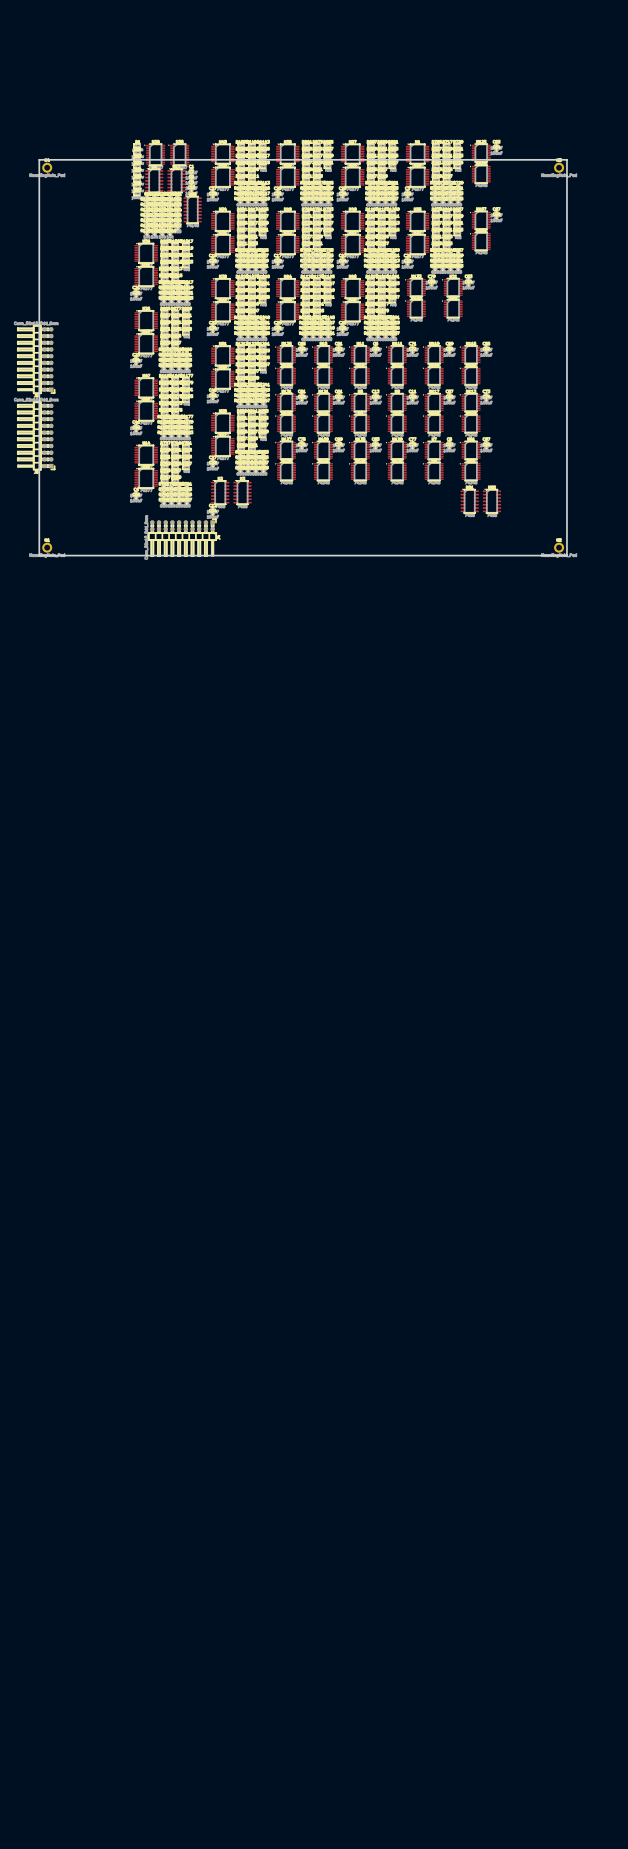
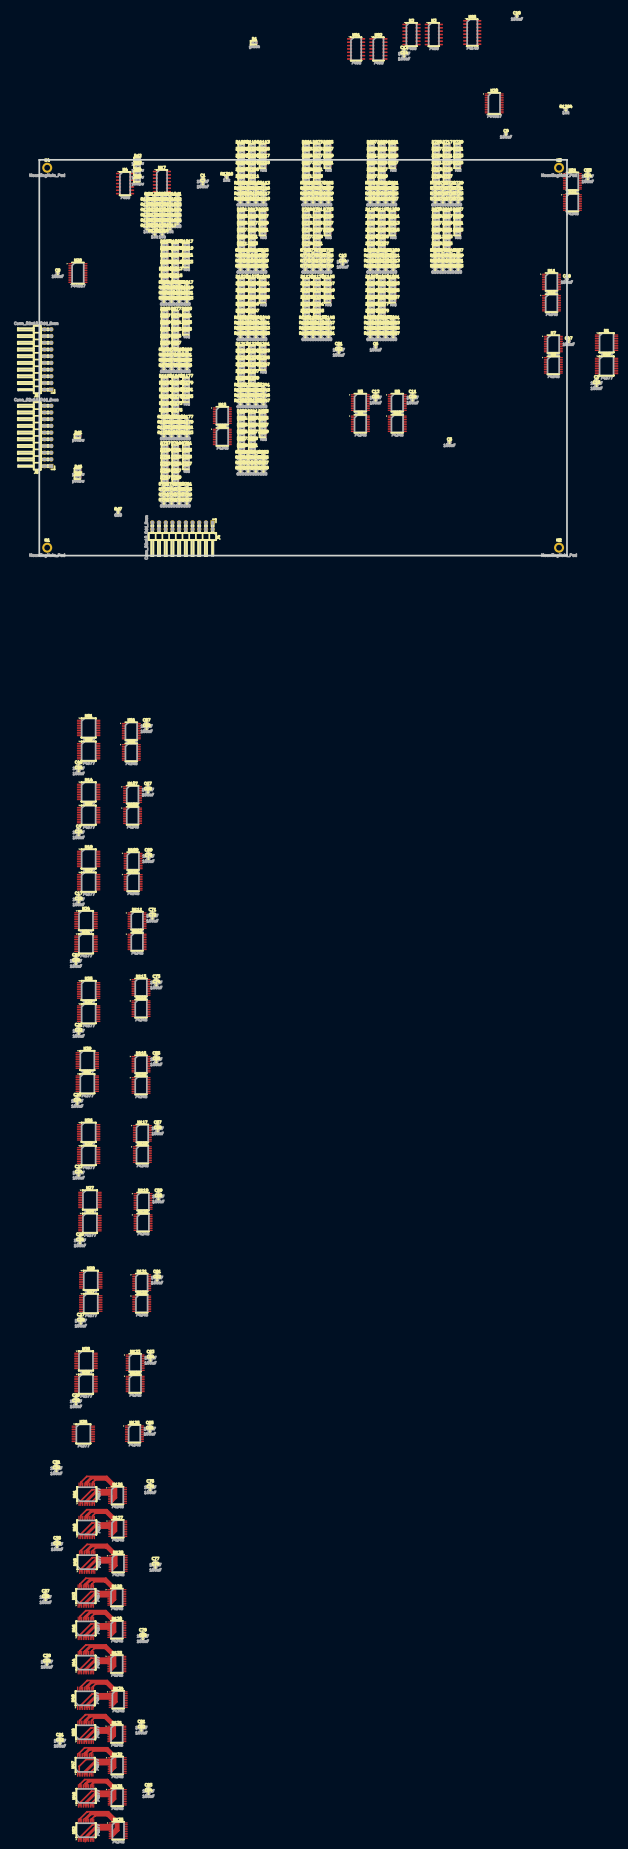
part position: (496, 144) -> (150, 1354)
part position: (137, 145) -> (254, 42)
part position: (496, 150) -> (150, 1359)
part position: (137, 152) -> (77, 436)
part position: (480, 152) -> (134, 1362)
part rotation: 0° (222, 153) -> 90° counterclockwise (85, 1596)
part position: (222, 153) -> (85, 1596)
part position: (287, 153) -> (85, 1360)
part position: (352, 153) -> (89, 1199)
part position: (417, 153) -> (606, 342)
part position: (154, 154) -> (77, 273)
part position: (178, 154) -> (493, 103)
part position: (191, 169) -> (202, 178)
part position: (191, 174) -> (202, 183)
part position: (480, 174) -> (134, 1383)
part rotation: 0° (222, 177) -> 90° counterclockwise (85, 1628)
part position: (222, 177) -> (85, 1628)
part position: (287, 177) -> (85, 1383)
part position: (352, 177) -> (89, 1222)
part position: (417, 177) -> (606, 365)
part position: (154, 180) -> (125, 183)
part position: (176, 180) -> (161, 181)
part position: (191, 180) -> (57, 273)
part position: (191, 185) -> (505, 133)
part position: (137, 186) -> (77, 470)
part position: (191, 190) -> (516, 16)
part position: (212, 191) -> (45, 1594)
part position: (277, 191) -> (75, 1398)
part position: (342, 191) -> (79, 1237)
part position: (407, 191) -> (596, 380)
part position: (137, 193) -> (77, 477)
part position: (212, 196) -> (45, 1599)
part position: (277, 196) -> (75, 1403)
part position: (342, 196) -> (79, 1242)
part position: (407, 196) -> (596, 385)
part position: (192, 209) -> (472, 32)
part position: (496, 212) -> (147, 786)
part position: (496, 217) -> (147, 791)
part position: (480, 220) -> (131, 794)
part position: (222, 221) -> (85, 920)
part position: (287, 221) -> (88, 858)
part rotation: 0° (352, 221) -> 90° counterclockwise (85, 1795)
part position: (352, 221) -> (85, 1795)
part position: (417, 221) -> (88, 990)
part position: (177, 228) -> (118, 512)
part position: (146, 233) -> (565, 109)
part position: (169, 233) -> (226, 176)
part position: (480, 241) -> (131, 815)
part position: (222, 244) -> (85, 943)
part position: (287, 244) -> (88, 881)
part rotation: 0° (352, 244) -> 90° counterclockwise (85, 1830)
part position: (352, 244) -> (85, 1830)
part position: (417, 244) -> (88, 1013)
part position: (146, 253) -> (83, 1433)
part position: (212, 258) -> (75, 957)
part position: (277, 258) -> (78, 896)
part position: (407, 258) -> (78, 1027)
part position: (212, 263) -> (75, 963)
part position: (277, 263) -> (78, 901)
part position: (407, 263) -> (78, 1033)
part rotation: 0° (146, 276) -> 90° counterclockwise (86, 1494)
part position: (146, 276) -> (86, 1494)
part position: (431, 279) -> (142, 1633)
part position: (468, 279) -> (587, 173)
part position: (431, 284) -> (142, 1638)
part position: (468, 284) -> (587, 178)
part position: (415, 287) -> (116, 1663)
part position: (452, 287) -> (571, 181)
part position: (222, 288) -> (87, 1060)
part rotation: 0° (287, 288) -> 90° counterclockwise (85, 1662)
part position: (287, 288) -> (85, 1662)
part rotation: 0° (352, 288) -> 90° counterclockwise (86, 1527)
part position: (352, 288) -> (86, 1527)
part position: (136, 290) -> (56, 1465)
part position: (136, 295) -> (56, 1470)
part position: (415, 308) -> (117, 1699)
part position: (452, 308) -> (571, 202)
part position: (222, 311) -> (87, 1083)
part rotation: 0° (287, 311) -> 90° counterclockwise (84, 1698)
part position: (287, 311) -> (84, 1698)
part rotation: 0° (352, 311) -> 90° counterclockwise (86, 1562)
part position: (352, 311) -> (86, 1562)
part position: (146, 320) -> (88, 1132)
part position: (212, 325) -> (77, 1097)
part position: (277, 325) -> (46, 1658)
part position: (342, 325) -> (57, 1541)
part position: (212, 331) -> (77, 1103)
part position: (277, 331) -> (46, 1663)
part position: (342, 331) -> (57, 1546)
part position: (146, 343) -> (88, 1155)
part position: (301, 346) -> (149, 1425)
part position: (412, 346) -> (152, 912)
part position: (449, 346) -> (158, 1193)
part position: (486, 346) -> (156, 1056)
part position: (301, 351) -> (149, 1430)
part position: (375, 351) -> (566, 279)
part position: (412, 351) -> (152, 917)
part position: (449, 351) -> (158, 1198)
part position: (486, 351) -> (156, 1061)
part position: (285, 354) -> (133, 1433)
part position: (322, 354) -> (221, 415)
part position: (359, 354) -> (550, 281)
part position: (396, 354) -> (136, 920)
part position: (433, 354) -> (142, 1201)
part position: (470, 354) -> (140, 1064)
part position: (222, 355) -> (88, 727)
part position: (136, 357) -> (78, 1169)
part position: (136, 363) -> (78, 1174)
part position: (285, 376) -> (116, 1495)
part position: (322, 376) -> (221, 436)
part position: (359, 376) -> (550, 303)
part position: (396, 376) -> (136, 941)
part position: (433, 376) -> (142, 1222)
part position: (470, 376) -> (140, 1085)
part position: (222, 378) -> (88, 750)
part rotation: 0° (146, 387) -> 90° counterclockwise (84, 1764)
part position: (146, 387) -> (84, 1764)
part position: (212, 393) -> (78, 765)
part position: (301, 394) -> (141, 1724)
part position: (338, 394) -> (157, 1274)
part position: (449, 394) -> (157, 1125)
part position: (486, 394) -> (156, 979)
part position: (212, 398) -> (78, 770)
part position: (301, 399) -> (141, 1729)
part position: (338, 399) -> (157, 1279)
part position: (449, 399) -> (157, 1130)
part position: (486, 399) -> (156, 984)
part position: (285, 402) -> (116, 1733)
part position: (322, 402) -> (140, 1282)
part position: (433, 402) -> (141, 1133)
part position: (470, 402) -> (140, 987)
part rotation: 0° (146, 410) -> 90° counterclockwise (85, 1732)
part position: (146, 410) -> (85, 1732)
part position: (222, 422) -> (90, 1280)
part position: (285, 423) -> (116, 1765)
part position: (322, 423) -> (140, 1303)
part position: (433, 423) -> (141, 1154)
part position: (470, 423) -> (140, 1008)
part position: (136, 425) -> (59, 1737)
part position: (136, 430) -> (59, 1742)
part position: (301, 442) -> (150, 1484)
part position: (338, 442) -> (148, 853)
part position: (375, 442) -> (148, 1788)
part position: (412, 442) -> (155, 1561)
part position: (486, 442) -> (146, 723)
part position: (222, 446) -> (90, 1303)
part position: (301, 447) -> (150, 1489)
part position: (338, 447) -> (148, 858)
part position: (375, 447) -> (148, 1793)
part position: (412, 447) -> (155, 1566)
part position: (449, 447) -> (568, 341)
part position: (486, 447) -> (146, 728)
part position: (285, 450) -> (116, 1528)
part position: (322, 450) -> (132, 861)
part position: (359, 450) -> (117, 1830)
part position: (396, 450) -> (116, 1597)
part position: (433, 450) -> (552, 344)
part position: (470, 450) -> (130, 731)
part position: (146, 454) -> (88, 791)
part position: (212, 460) -> (80, 1317)
part position: (212, 465) -> (80, 1322)
part position: (285, 471) -> (117, 1563)
part position: (322, 471) -> (132, 882)
part position: (359, 471) -> (116, 1797)
part position: (396, 471) -> (116, 1629)
part position: (433, 471) -> (552, 365)
part position: (470, 471) -> (130, 752)
part position: (146, 478) -> (88, 814)
part position: (136, 492) -> (78, 829)
part position: (220, 492) -> (411, 34)
part position: (242, 492) -> (433, 34)
part position: (136, 497) -> (78, 834)
part position: (469, 500) -> (356, 48)
part position: (491, 500) -> (378, 48)
part position: (212, 508) -> (404, 50)
part position: (212, 513) -> (404, 55)
top track: none -> (80, 1484) (86, 1476) (106, 1476) (116, 1485) (116, 1497) (110, 1501)
top track: none -> (85, 1484) (90, 1477) (106, 1477) (115, 1486) (115, 1497) (110, 1499)
top track: none -> (87, 1484) (91, 1478) (106, 1478) (114, 1486) (114, 1496) (110, 1498)
top track: none -> (92, 1484) (95, 1479) (105, 1479) (113, 1487) (113, 1495) (110, 1496)
top track: none -> (110, 1489) (91, 1489) (80, 1500) (80, 1503)
top track: none -> (110, 1491) (95, 1491) (85, 1500) (85, 1503)
top track: none -> (110, 1493) (95, 1493) (87, 1500) (87, 1503)
top track: none -> (110, 1494) (98, 1494) (92, 1503)
top track: none -> (80, 1518) (86, 1509) (106, 1509) (116, 1519) (116, 1531) (110, 1534)
top track: none -> (85, 1518) (90, 1510) (106, 1510) (115, 1519) (115, 1530) (110, 1533)
top track: none -> (87, 1518) (91, 1511) (106, 1511) (114, 1520) (114, 1529) (110, 1531)
top track: none -> (92, 1518) (95, 1513) (105, 1513) (113, 1520) (113, 1529) (110, 1529)
top track: none -> (110, 1522) (91, 1522) (80, 1534) (80, 1536)
top track: none -> (110, 1524) (95, 1524) (85, 1534) (85, 1536)
top track: none -> (110, 1526) (95, 1526) (87, 1534) (87, 1536)
top track: none -> (110, 1528) (98, 1528) (92, 1536)
top track: none -> (81, 1552) (87, 1544) (107, 1544) (116, 1553) (116, 1565) (110, 1569)
top track: none -> (86, 1552) (91, 1545) (106, 1545) (115, 1554) (115, 1565) (110, 1567)
top track: none -> (88, 1552) (91, 1546) (106, 1546) (114, 1554) (114, 1564) (110, 1566)
top track: none -> (93, 1552) (95, 1547) (106, 1547) (113, 1555) (113, 1563) (110, 1564)
top track: none -> (110, 1557) (92, 1557) (81, 1568) (81, 1571)
top track: none -> (110, 1559) (95, 1559) (86, 1568) (86, 1571)
top track: none -> (110, 1561) (95, 1561) (88, 1568) (88, 1571)
top track: none -> (110, 1562) (99, 1562) (93, 1571)
top track: none -> (79, 1586) (85, 1578) (105, 1578) (115, 1587) (115, 1599) (109, 1603)
top track: none -> (85, 1586) (89, 1579) (105, 1579) (114, 1588) (114, 1598) (109, 1601)
top track: none -> (86, 1586) (90, 1580) (105, 1580) (113, 1588) (113, 1598) (109, 1600)
top track: none -> (91, 1586) (94, 1581) (104, 1581) (112, 1589) (112, 1597) (109, 1598)
top track: none -> (109, 1591) (91, 1591) (79, 1602) (79, 1605)
top track: none -> (109, 1593) (94, 1593) (85, 1602) (85, 1605)
top track: none -> (109, 1594) (94, 1594) (86, 1602) (86, 1605)
top track: none -> (109, 1596) (97, 1596) (91, 1605)
top track: none -> (79, 1619) (85, 1610) (105, 1610) (115, 1620) (115, 1631) (109, 1635)
top track: none -> (85, 1619) (89, 1611) (105, 1611) (114, 1620) (114, 1631) (109, 1634)
top track: none -> (86, 1619) (90, 1612) (105, 1612) (113, 1621) (113, 1630) (109, 1632)
top track: none -> (91, 1619) (94, 1614) (104, 1614) (112, 1621) (112, 1629) (109, 1630)
top track: none -> (109, 1623) (91, 1623) (79, 1634) (79, 1637)
top track: none -> (109, 1625) (94, 1625) (85, 1634) (85, 1637)
top track: none -> (109, 1627) (94, 1627) (86, 1634) (86, 1637)
top track: none -> (109, 1629) (97, 1629) (91, 1637)
top track: none -> (79, 1653) (85, 1644) (105, 1644) (115, 1654) (115, 1666) (109, 1670)
top track: none -> (85, 1653) (89, 1645) (105, 1645) (114, 1654) (114, 1665) (109, 1668)
top track: none -> (86, 1653) (90, 1647) (105, 1647) (113, 1655) (113, 1664) (109, 1666)
top track: none -> (91, 1653) (94, 1648) (104, 1648) (112, 1655) (112, 1664) (109, 1665)
top track: none -> (109, 1658) (91, 1658) (79, 1669) (79, 1671)
top track: none -> (109, 1659) (94, 1659) (85, 1669) (85, 1671)
top track: none -> (109, 1661) (94, 1661) (86, 1669) (86, 1671)
top track: none -> (109, 1663) (97, 1663) (91, 1671)
top track: none -> (81, 1688) (87, 1680) (107, 1680) (116, 1690) (116, 1701) (110, 1705)
top track: none -> (86, 1688) (91, 1681) (106, 1681) (115, 1690) (115, 1701) (110, 1704)
top track: none -> (88, 1688) (91, 1682) (106, 1682) (114, 1690) (114, 1700) (110, 1702)
top track: none -> (93, 1688) (95, 1683) (106, 1683) (113, 1691) (113, 1699) (110, 1700)
top track: none -> (110, 1693) (92, 1693) (81, 1704) (81, 1707)
top track: none -> (110, 1695) (95, 1695) (86, 1704) (86, 1707)
top track: none -> (110, 1697) (95, 1697) (88, 1704) (88, 1707)
top track: none -> (110, 1698) (99, 1698) (93, 1707)
top track: none -> (79, 1723) (85, 1714) (105, 1714) (115, 1724) (115, 1735) (109, 1739)
top track: none -> (84, 1723) (89, 1715) (105, 1715) (114, 1724) (114, 1735) (109, 1738)
top track: none -> (86, 1723) (90, 1716) (104, 1716) (113, 1725) (113, 1734) (109, 1736)
top track: none -> (91, 1723) (94, 1718) (104, 1718) (112, 1725) (112, 1733) (109, 1734)
top track: none -> (109, 1727) (90, 1727) (79, 1739) (79, 1741)
top track: none -> (109, 1729) (94, 1729) (84, 1739) (84, 1741)
top track: none -> (109, 1731) (94, 1731) (86, 1739) (86, 1741)
top track: none -> (109, 1733) (97, 1733) (91, 1741)
top track: none -> (79, 1755) (84, 1747) (107, 1747) (115, 1755) (115, 1767) (109, 1771)
top track: none -> (84, 1755) (88, 1748) (107, 1748) (114, 1756) (114, 1766) (109, 1769)
top track: none -> (86, 1755) (89, 1749) (106, 1749) (113, 1756) (113, 1766) (109, 1768)
top track: none -> (91, 1755) (93, 1750) (106, 1750) (112, 1757) (112, 1765) (109, 1766)
top track: none -> (109, 1759) (86, 1759) (79, 1766) (79, 1774)
top track: none -> (109, 1761) (94, 1761) (84, 1771) (84, 1774)
top track: none -> (109, 1762) (94, 1762) (86, 1771) (86, 1774)
top track: none -> (109, 1764) (98, 1764) (91, 1774)
top track: none -> (80, 1786) (84, 1779) (107, 1779) (115, 1787) (115, 1799) (109, 1803)
top track: none -> (85, 1786) (88, 1780) (107, 1780) (114, 1787) (114, 1798) (109, 1801)
top track: none -> (86, 1786) (88, 1781) (106, 1781) (113, 1788) (113, 1797) (109, 1799)
top track: none -> (92, 1786) (93, 1782) (106, 1782) (112, 1788) (112, 1797) (109, 1798)
top track: none -> (109, 1791) (91, 1791) (80, 1802) (80, 1805)
top track: none -> (109, 1792) (94, 1792) (85, 1802) (85, 1805)
top track: none -> (109, 1794) (94, 1794) (86, 1802) (86, 1805)
top track: none -> (109, 1796) (98, 1796) (92, 1805)
top track: none -> (80, 1820) (86, 1811) (108, 1811) (118, 1821) (118, 1830) (110, 1836)
top track: none -> (85, 1820) (90, 1813) (107, 1813) (117, 1823) (117, 1829) (110, 1834)
top track: none -> (86, 1820) (91, 1814) (107, 1814) (116, 1823) (116, 1829) (110, 1833)
top track: none -> (92, 1820) (95, 1815) (107, 1815) (115, 1824) (115, 1828) (110, 1831)
top track: none -> (110, 1824) (92, 1824) (80, 1839)
top track: none -> (112, 1826) (95, 1826) (85, 1836) (85, 1841)
top track: none -> (110, 1828) (95, 1828) (86, 1837)
top track: none -> (110, 1829) (99, 1829) (92, 1839)
top track: none -> (86, 1836) (87, 1839)

